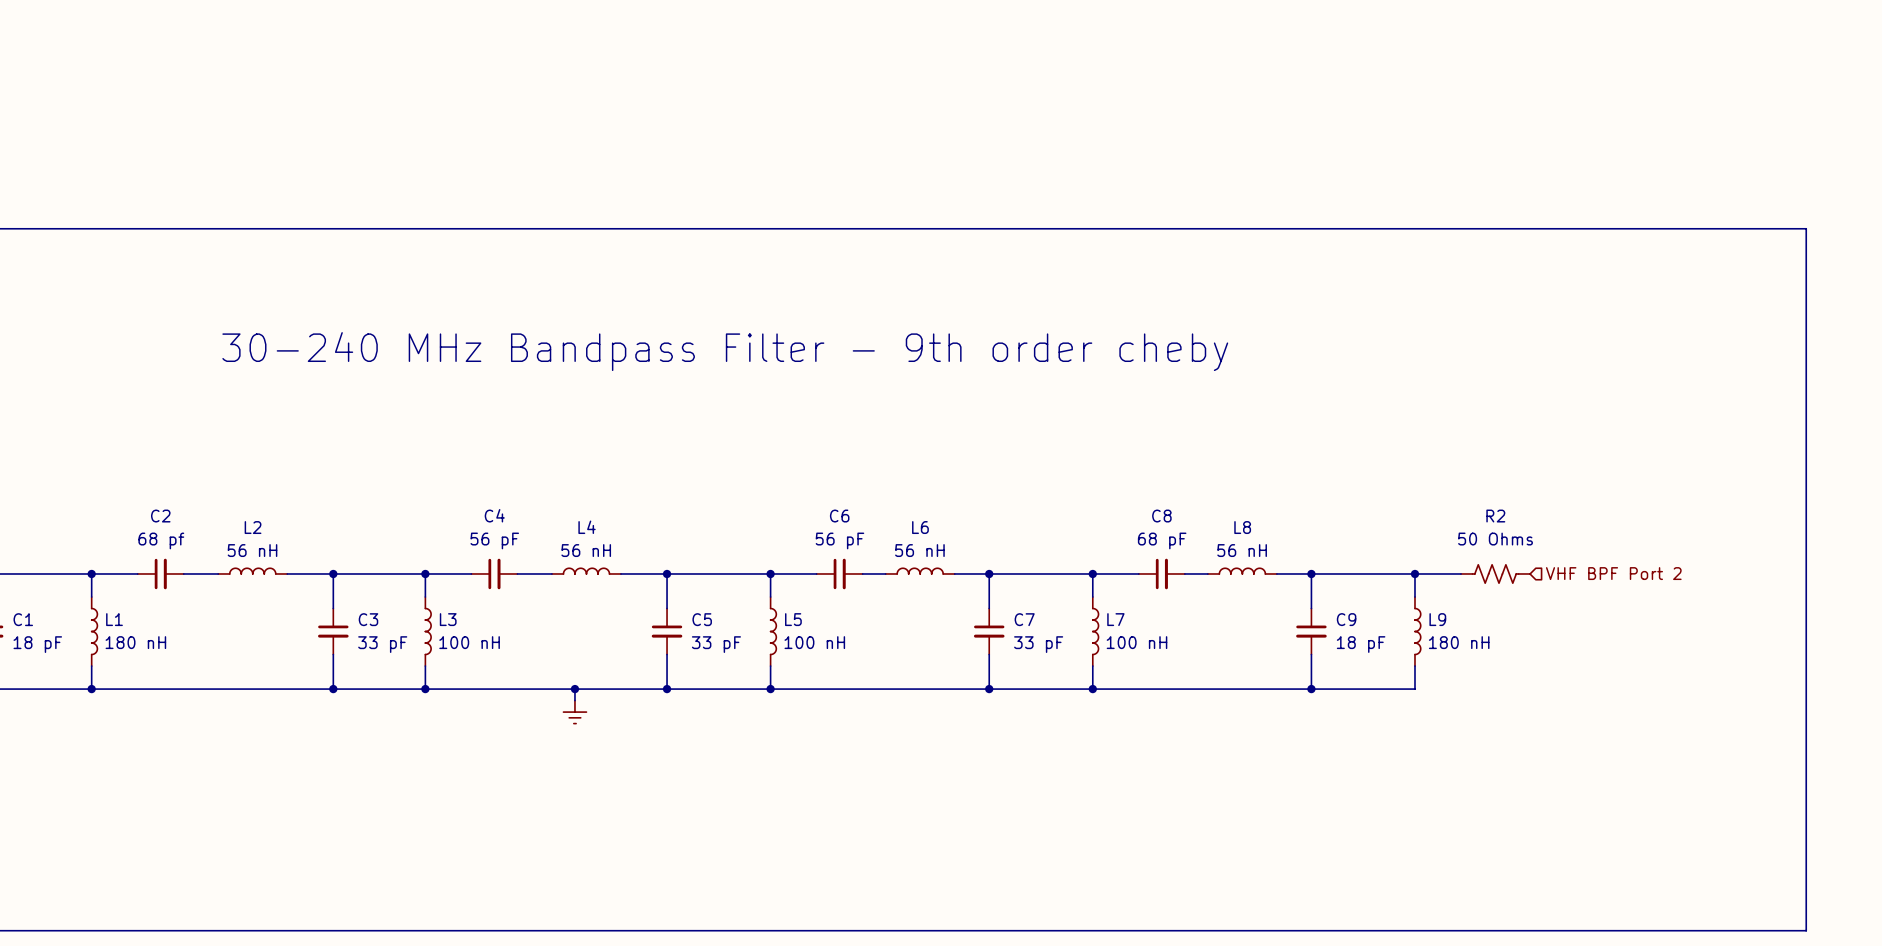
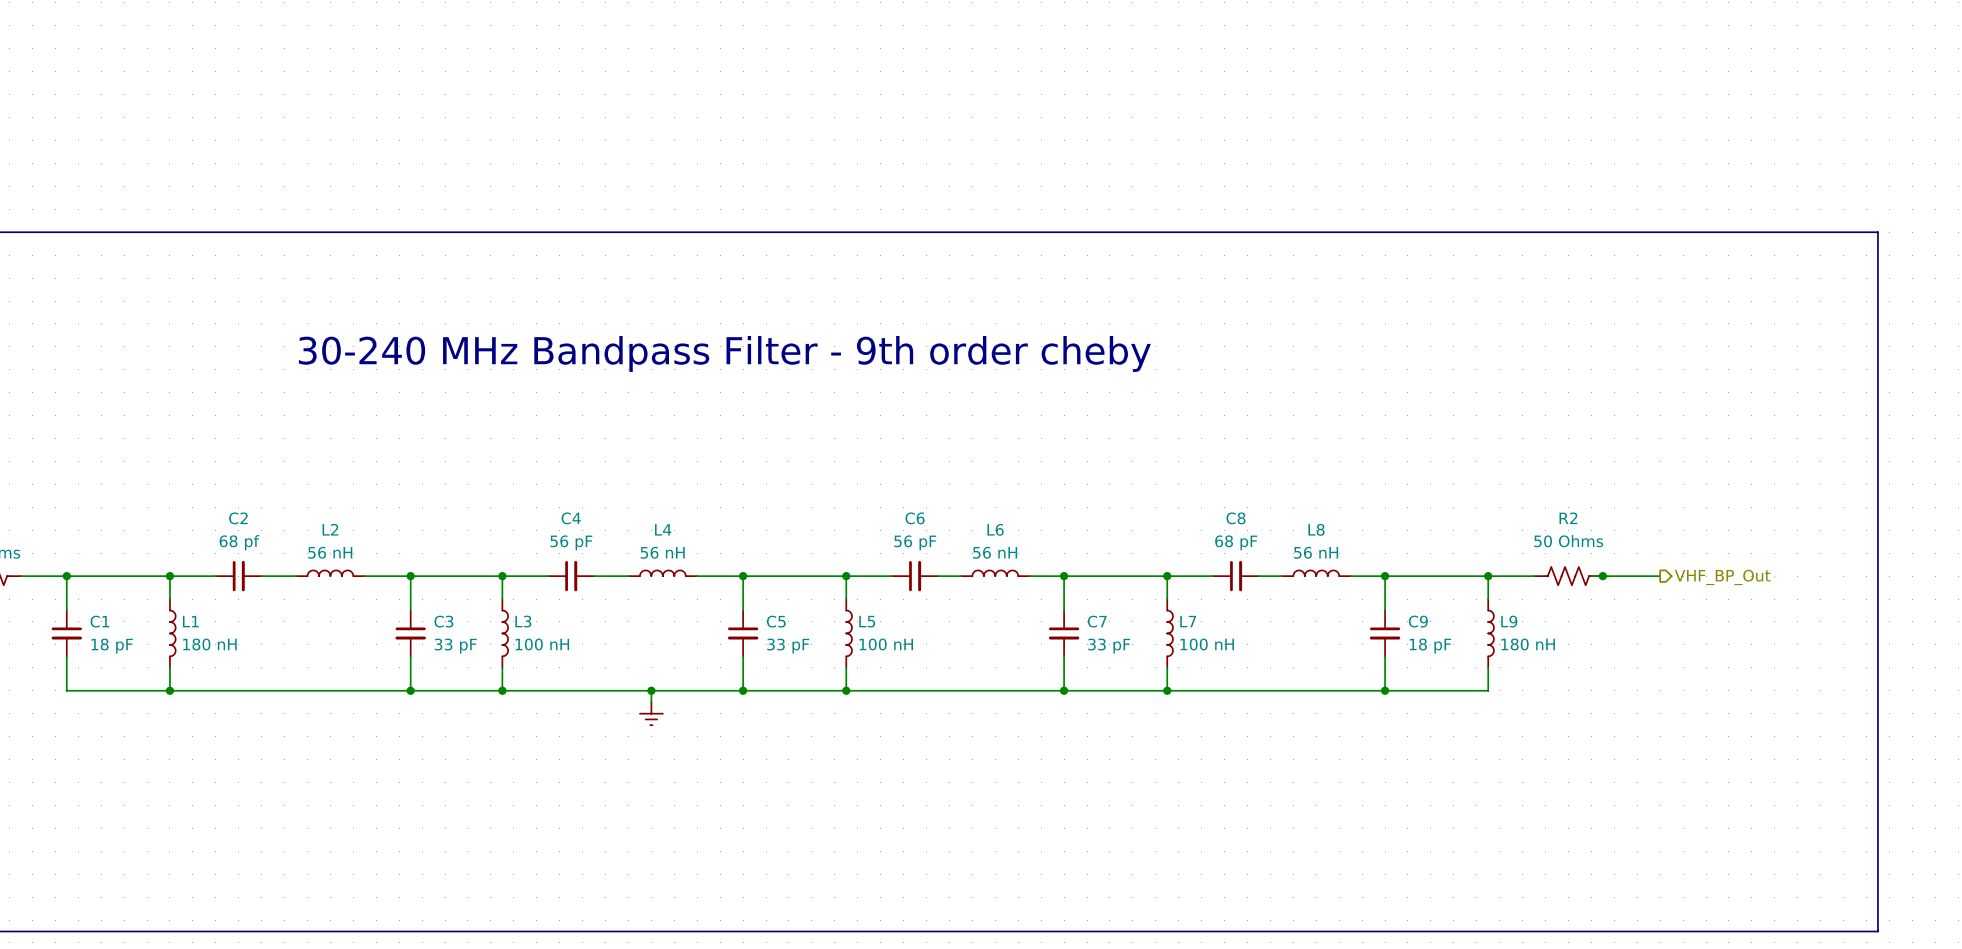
wire: none -> (1591, 576) (1660, 576)
junction: none -> (1602, 576)
hierarchical label: VHF BPF Port 2 (1613, 573) -> none
hierarchical label: none -> VHF_BP_Out (1722, 577)

